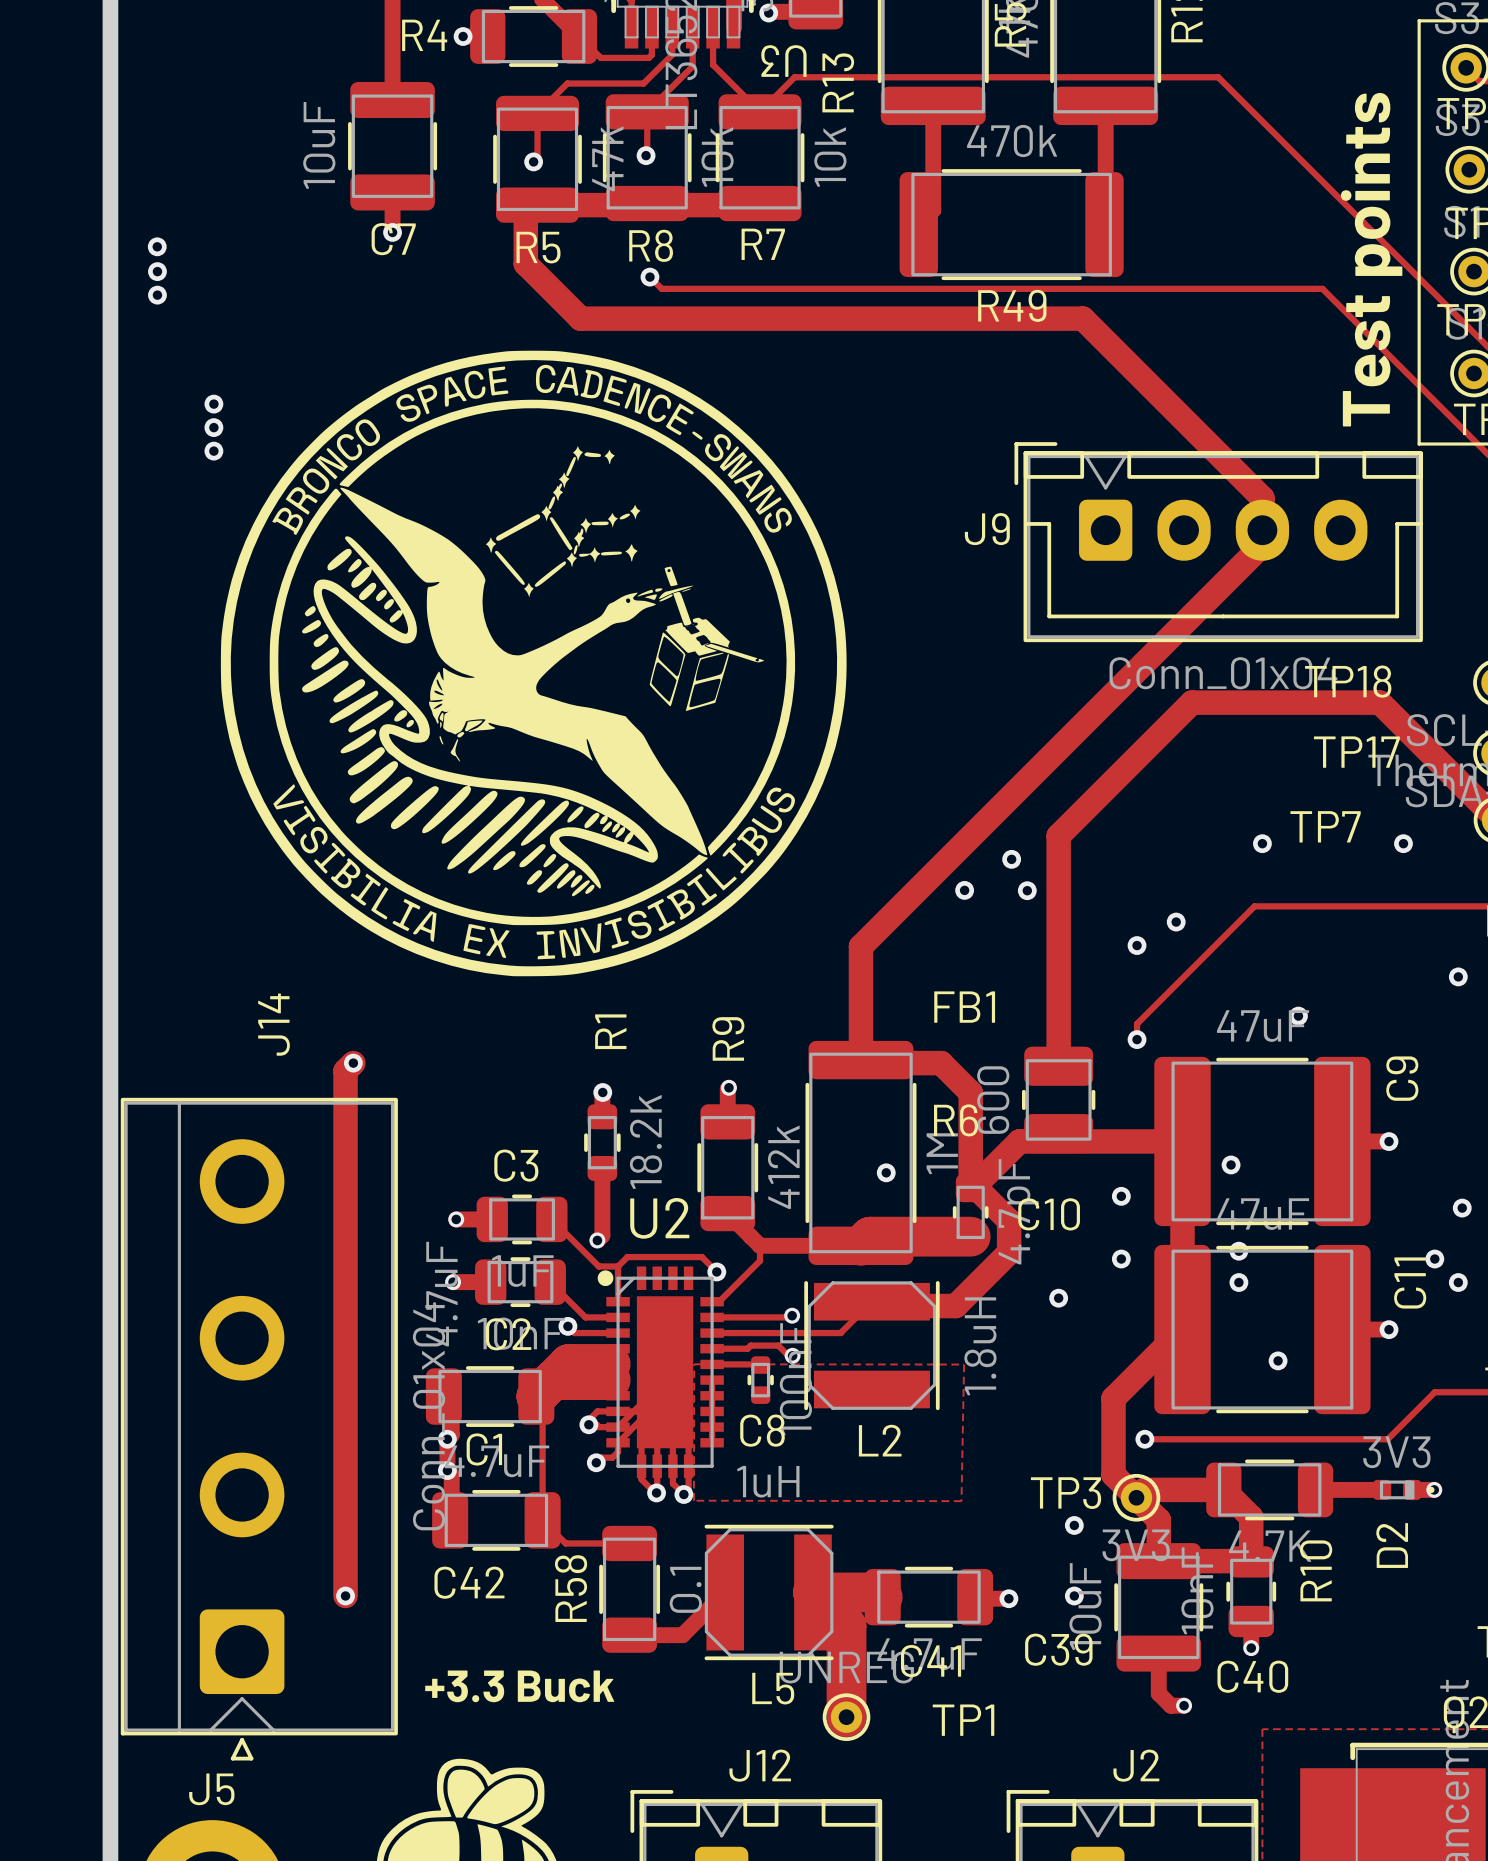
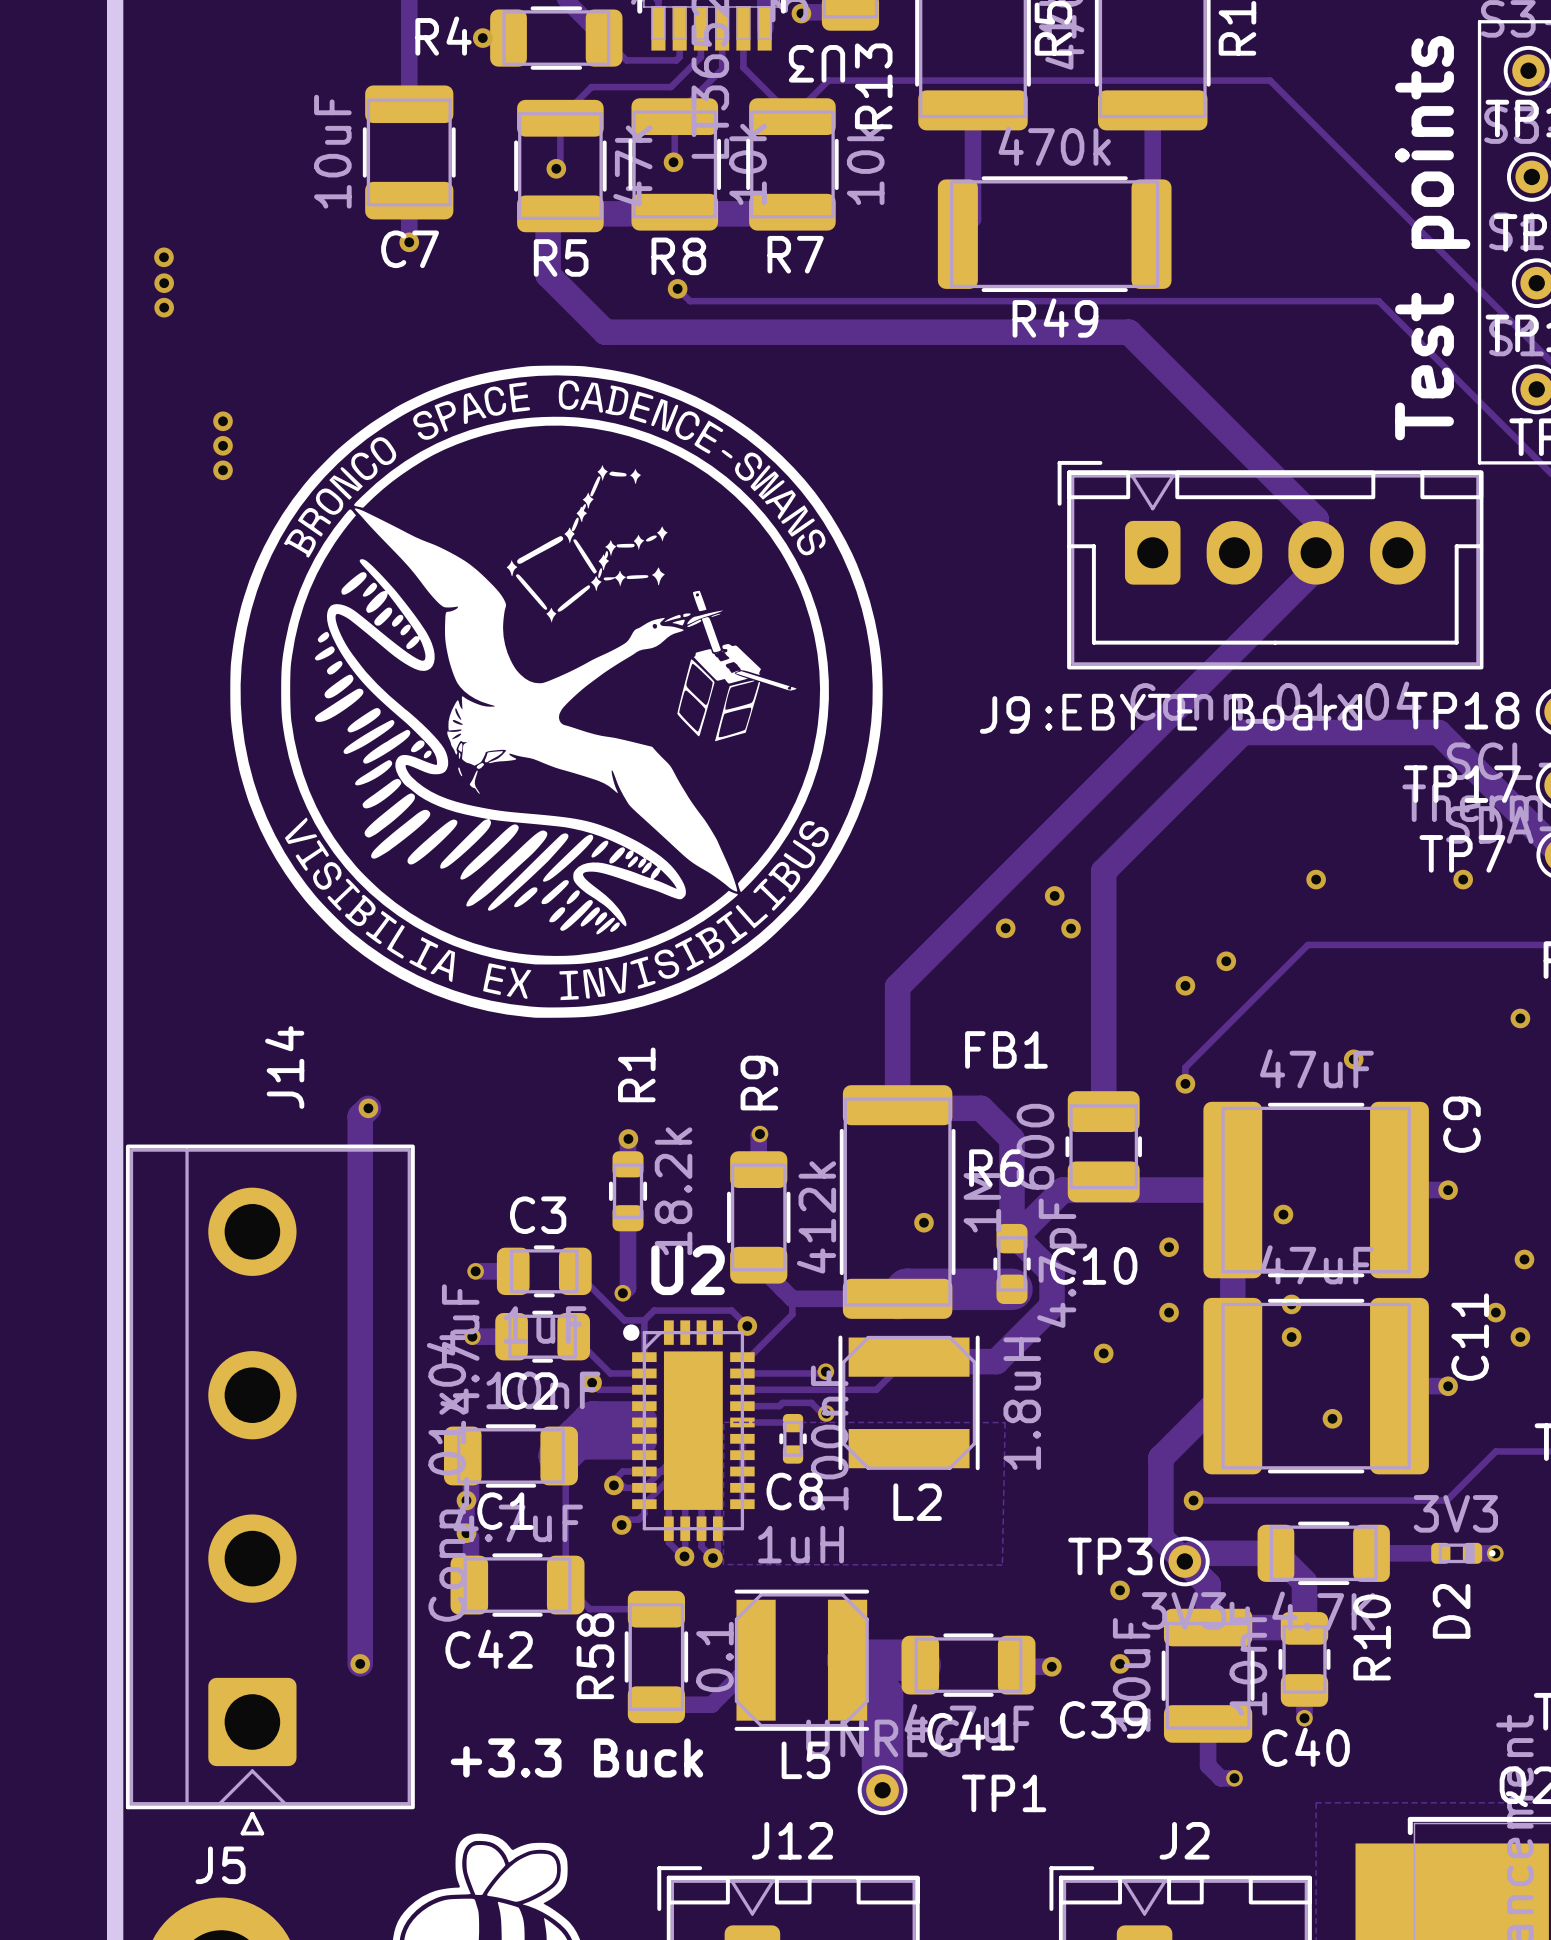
J9 name position: J9 (987, 529) -> J9 (1004, 714)
TP18 name position: TP18 (1348, 681) -> TP18 (1461, 710)
text: none -> :EBYTE Board (1203, 712)
TP17 name position: TP17 (1356, 752) -> TP17 (1462, 784)
TP7 name position: TP7 (1325, 826) -> TP7 (1462, 853)

